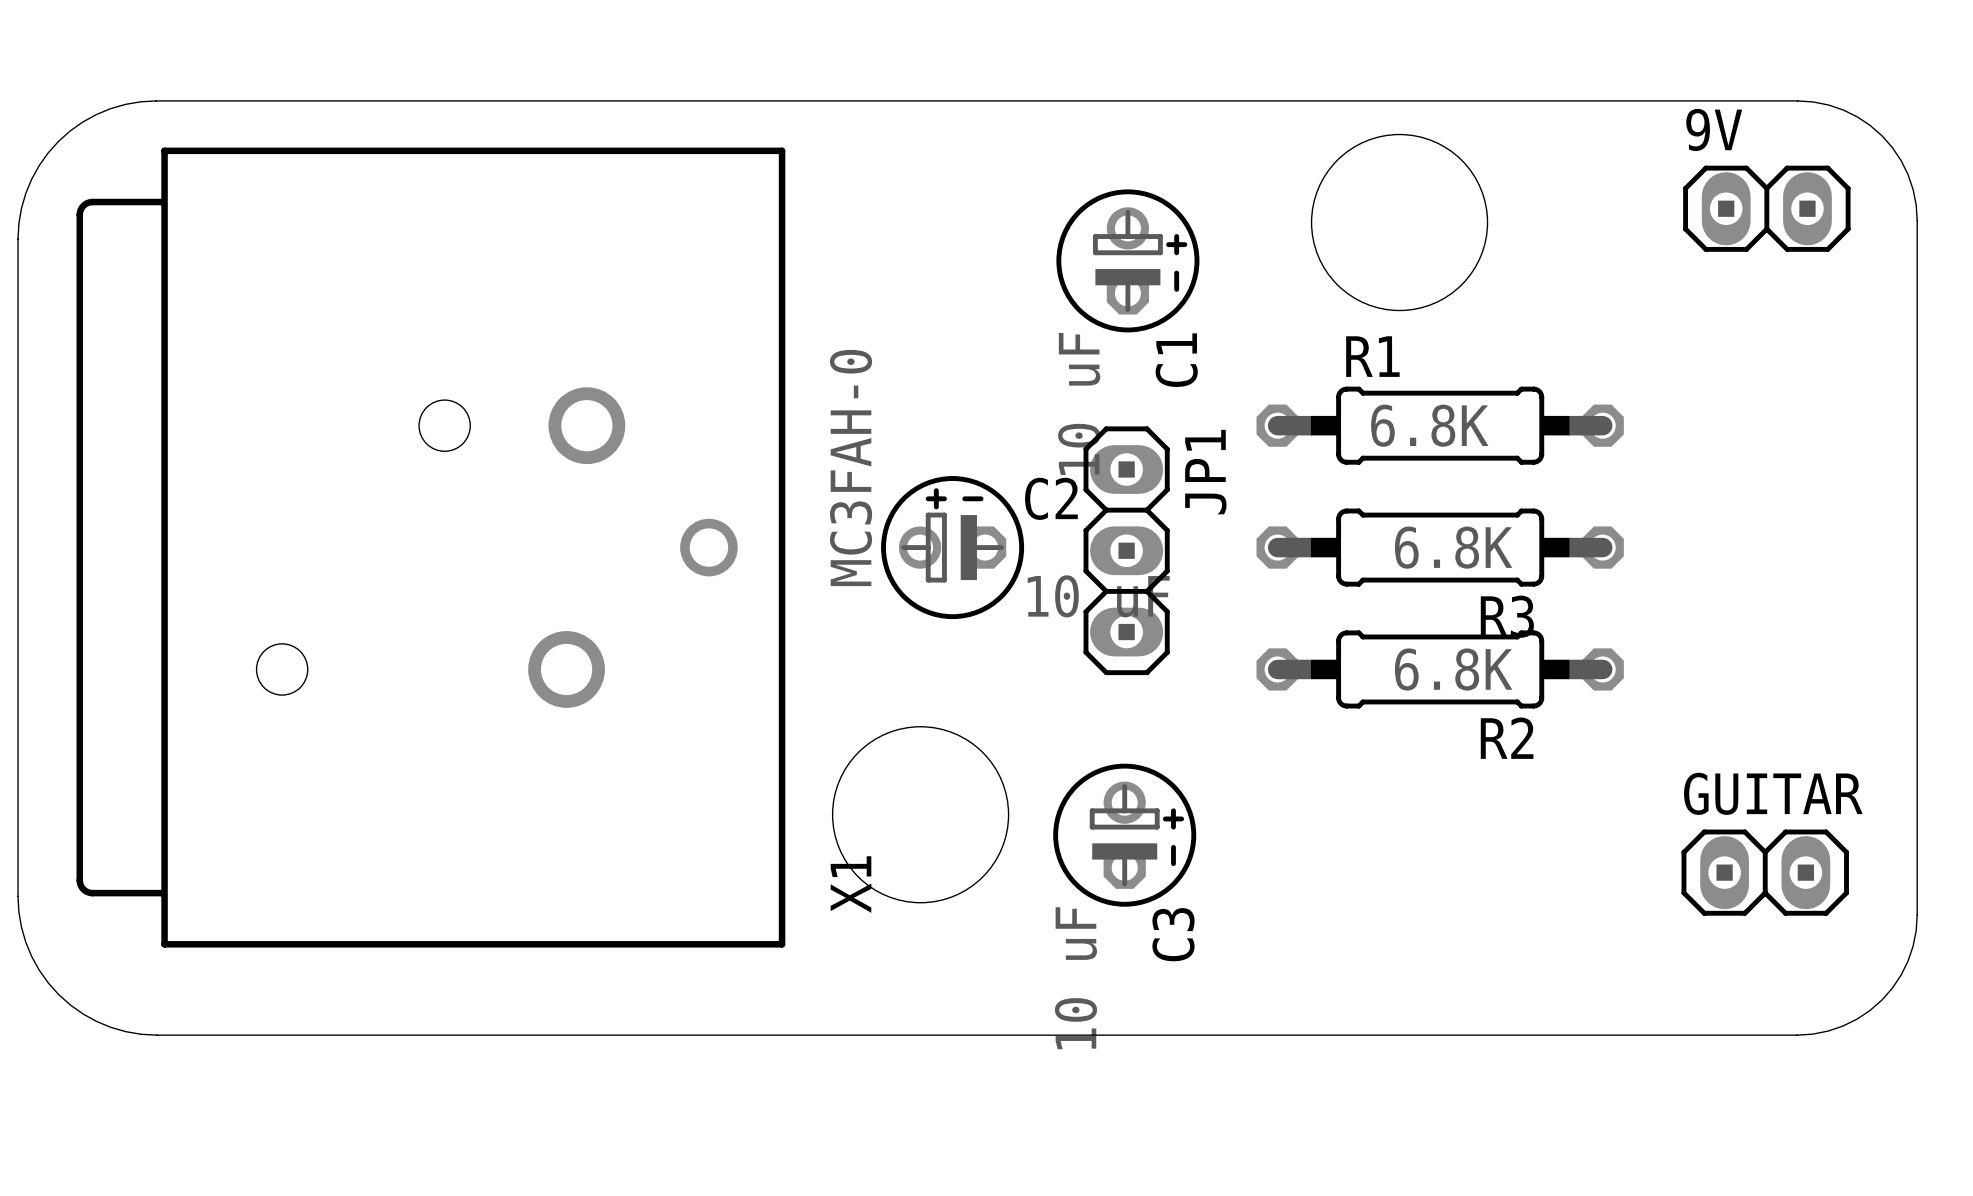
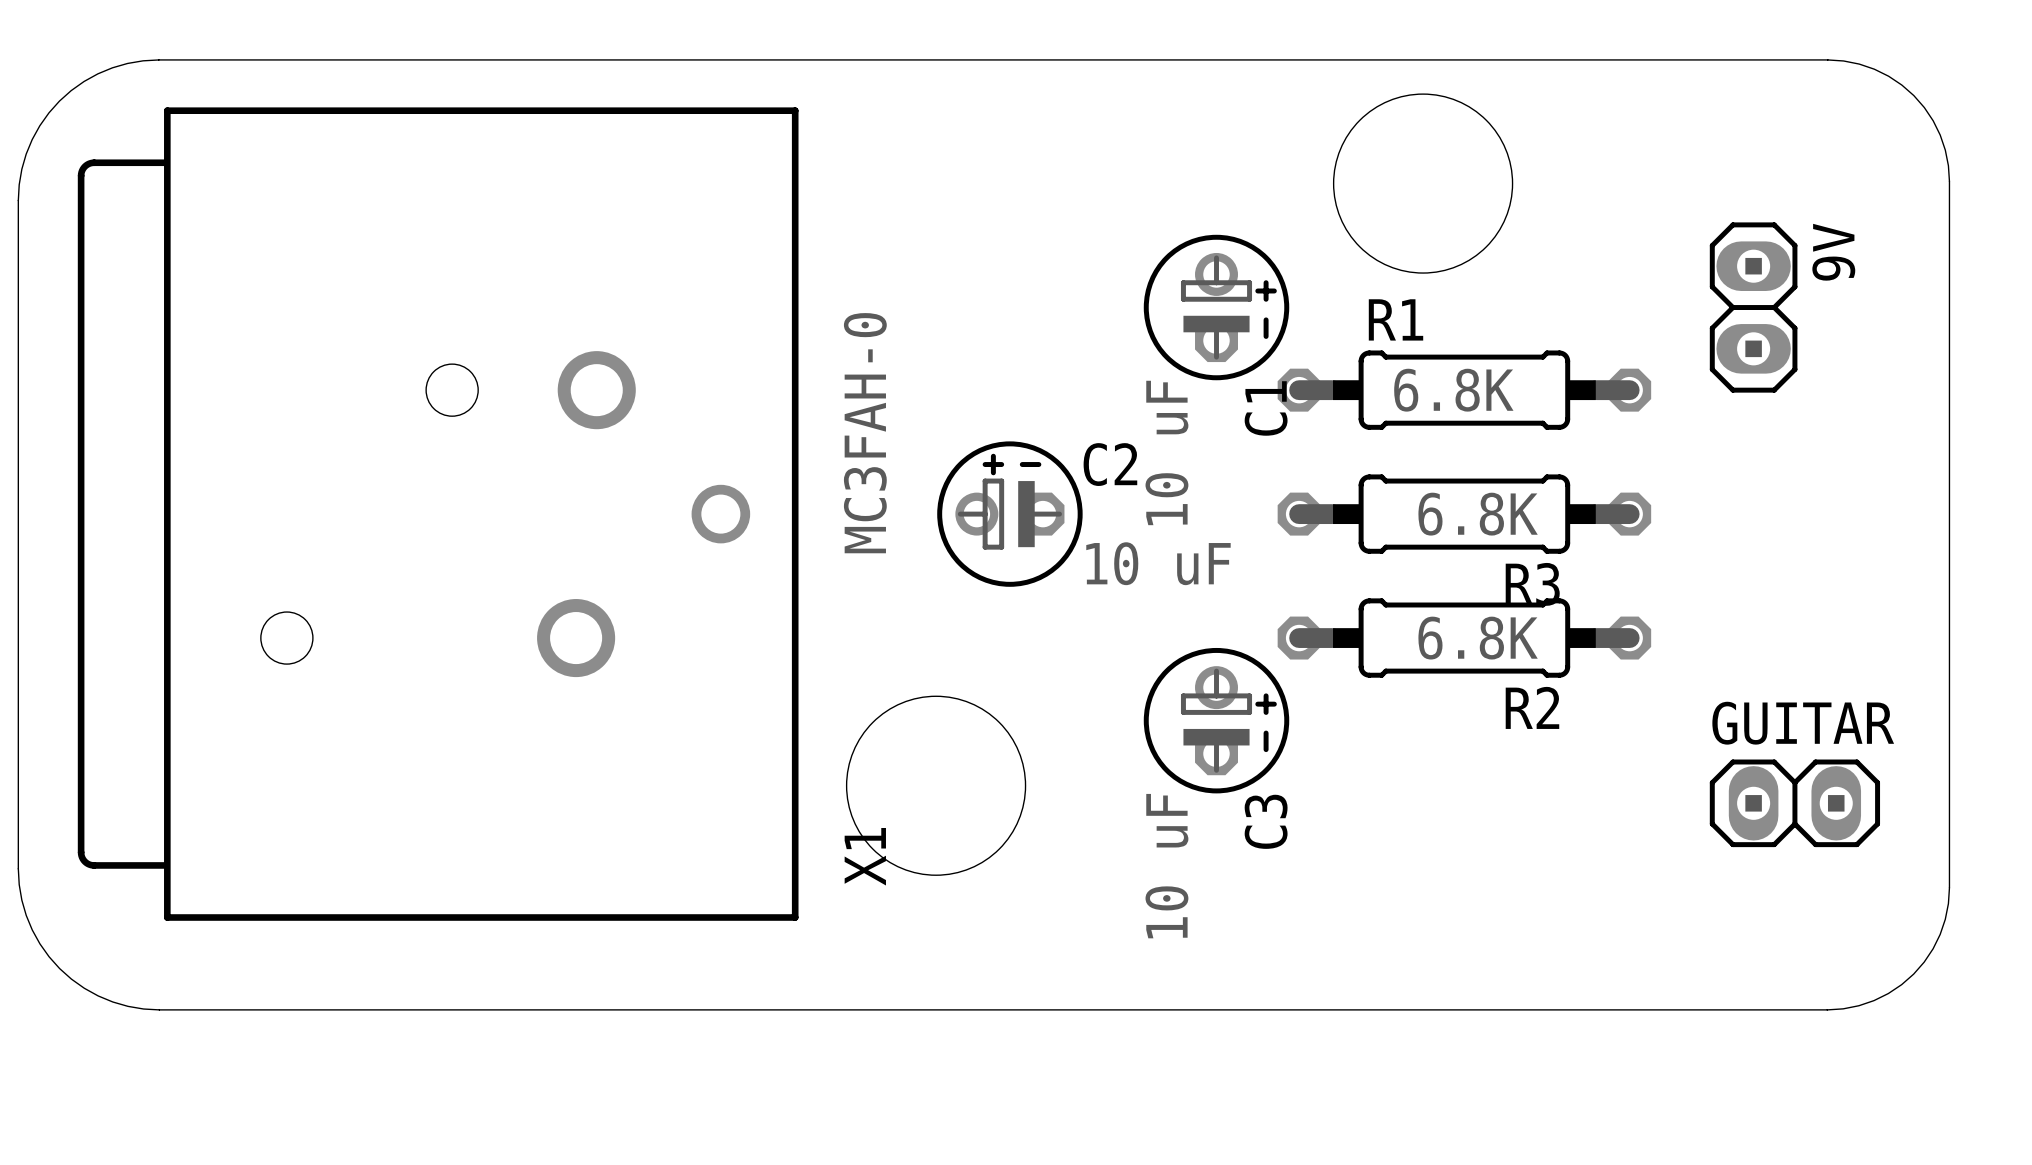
9V rotation: 0° (1766, 208) -> 90° clockwise (1753, 307)
9V position: (1766, 208) -> (1753, 307)
C1 position: (1127, 260) -> (1216, 307)
C2 position: (952, 547) -> (1009, 514)
JP1: (1126, 550) -> none
C3 position: (1124, 835) -> (1216, 720)
GUITAR position: (1765, 872) -> (1794, 803)

